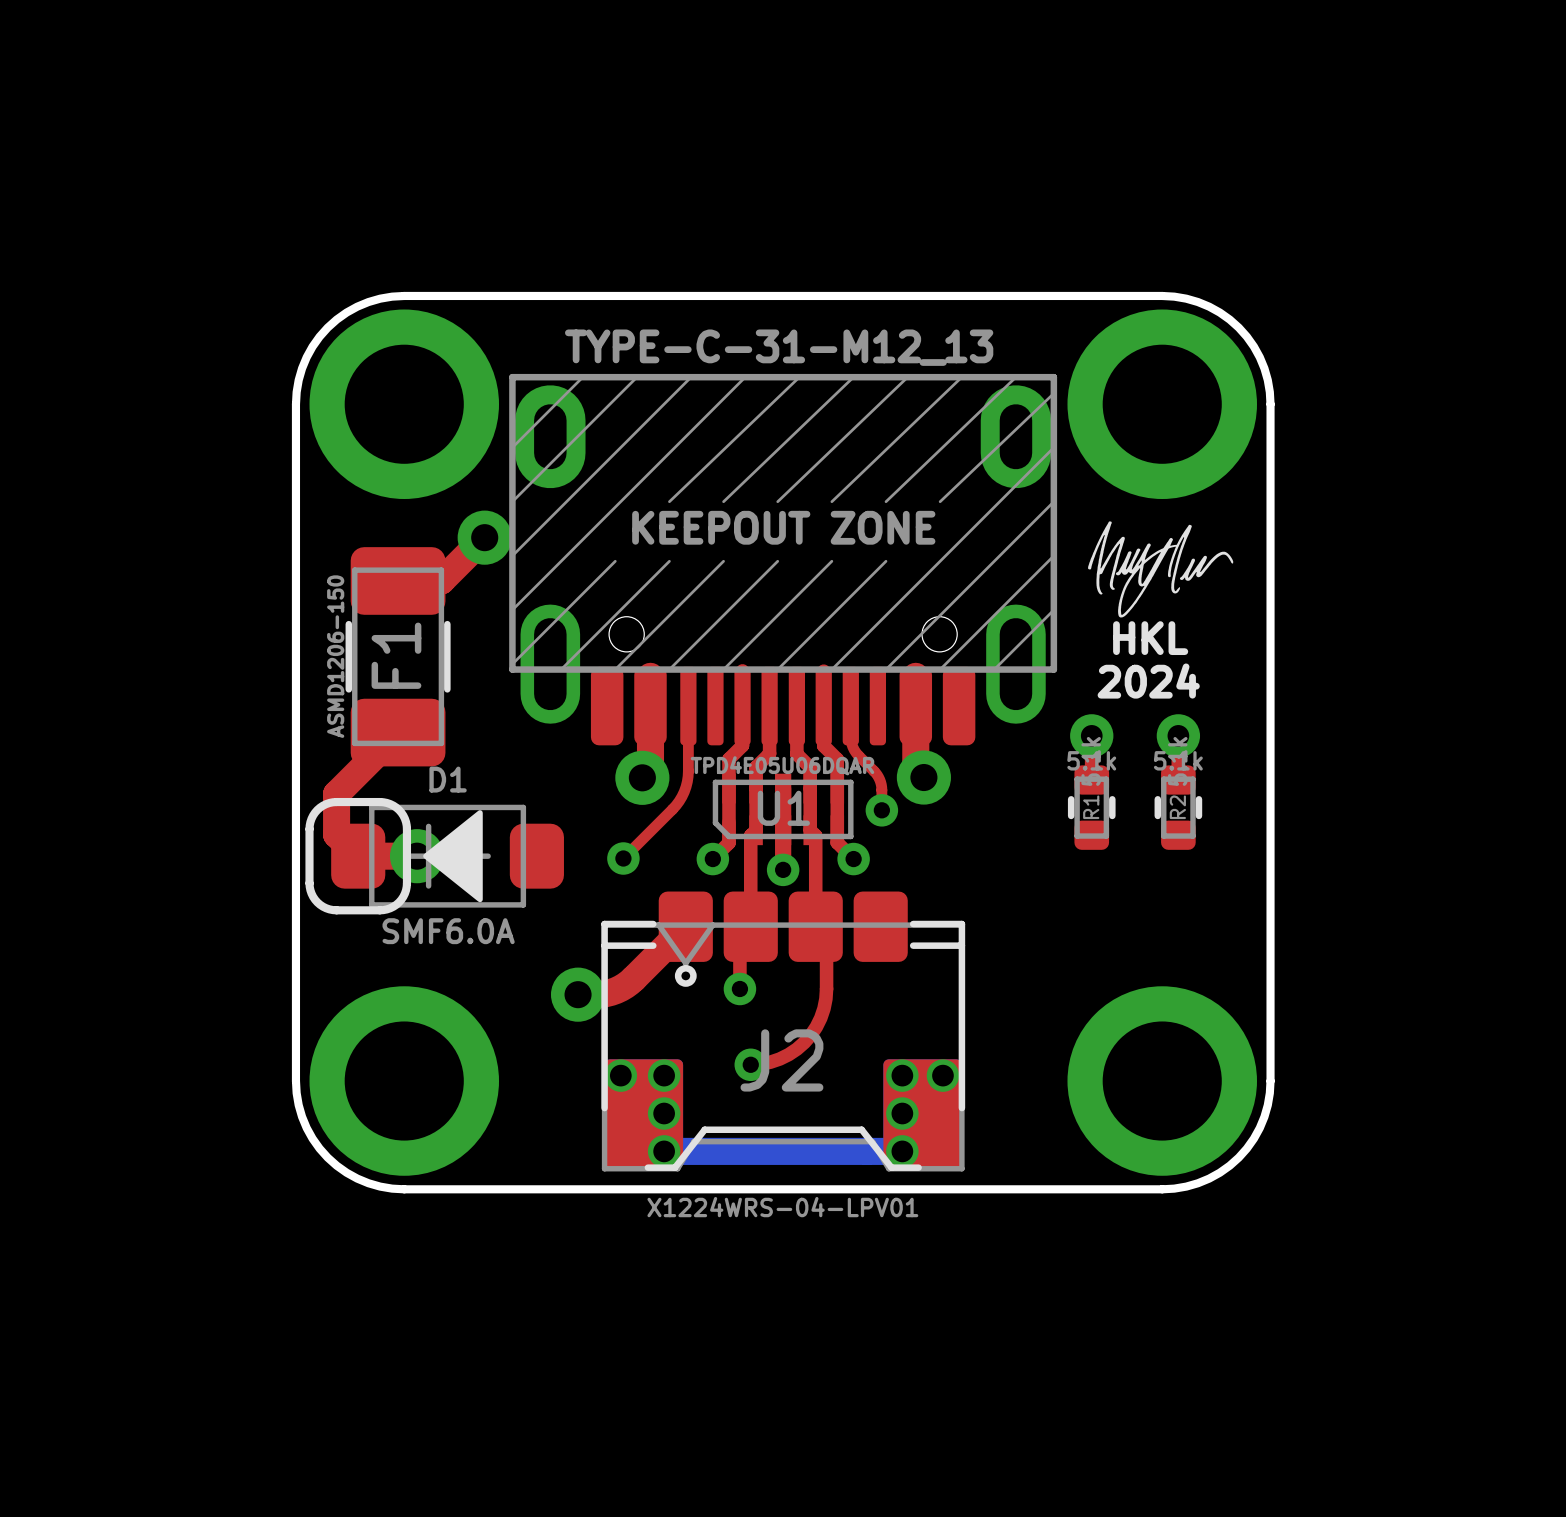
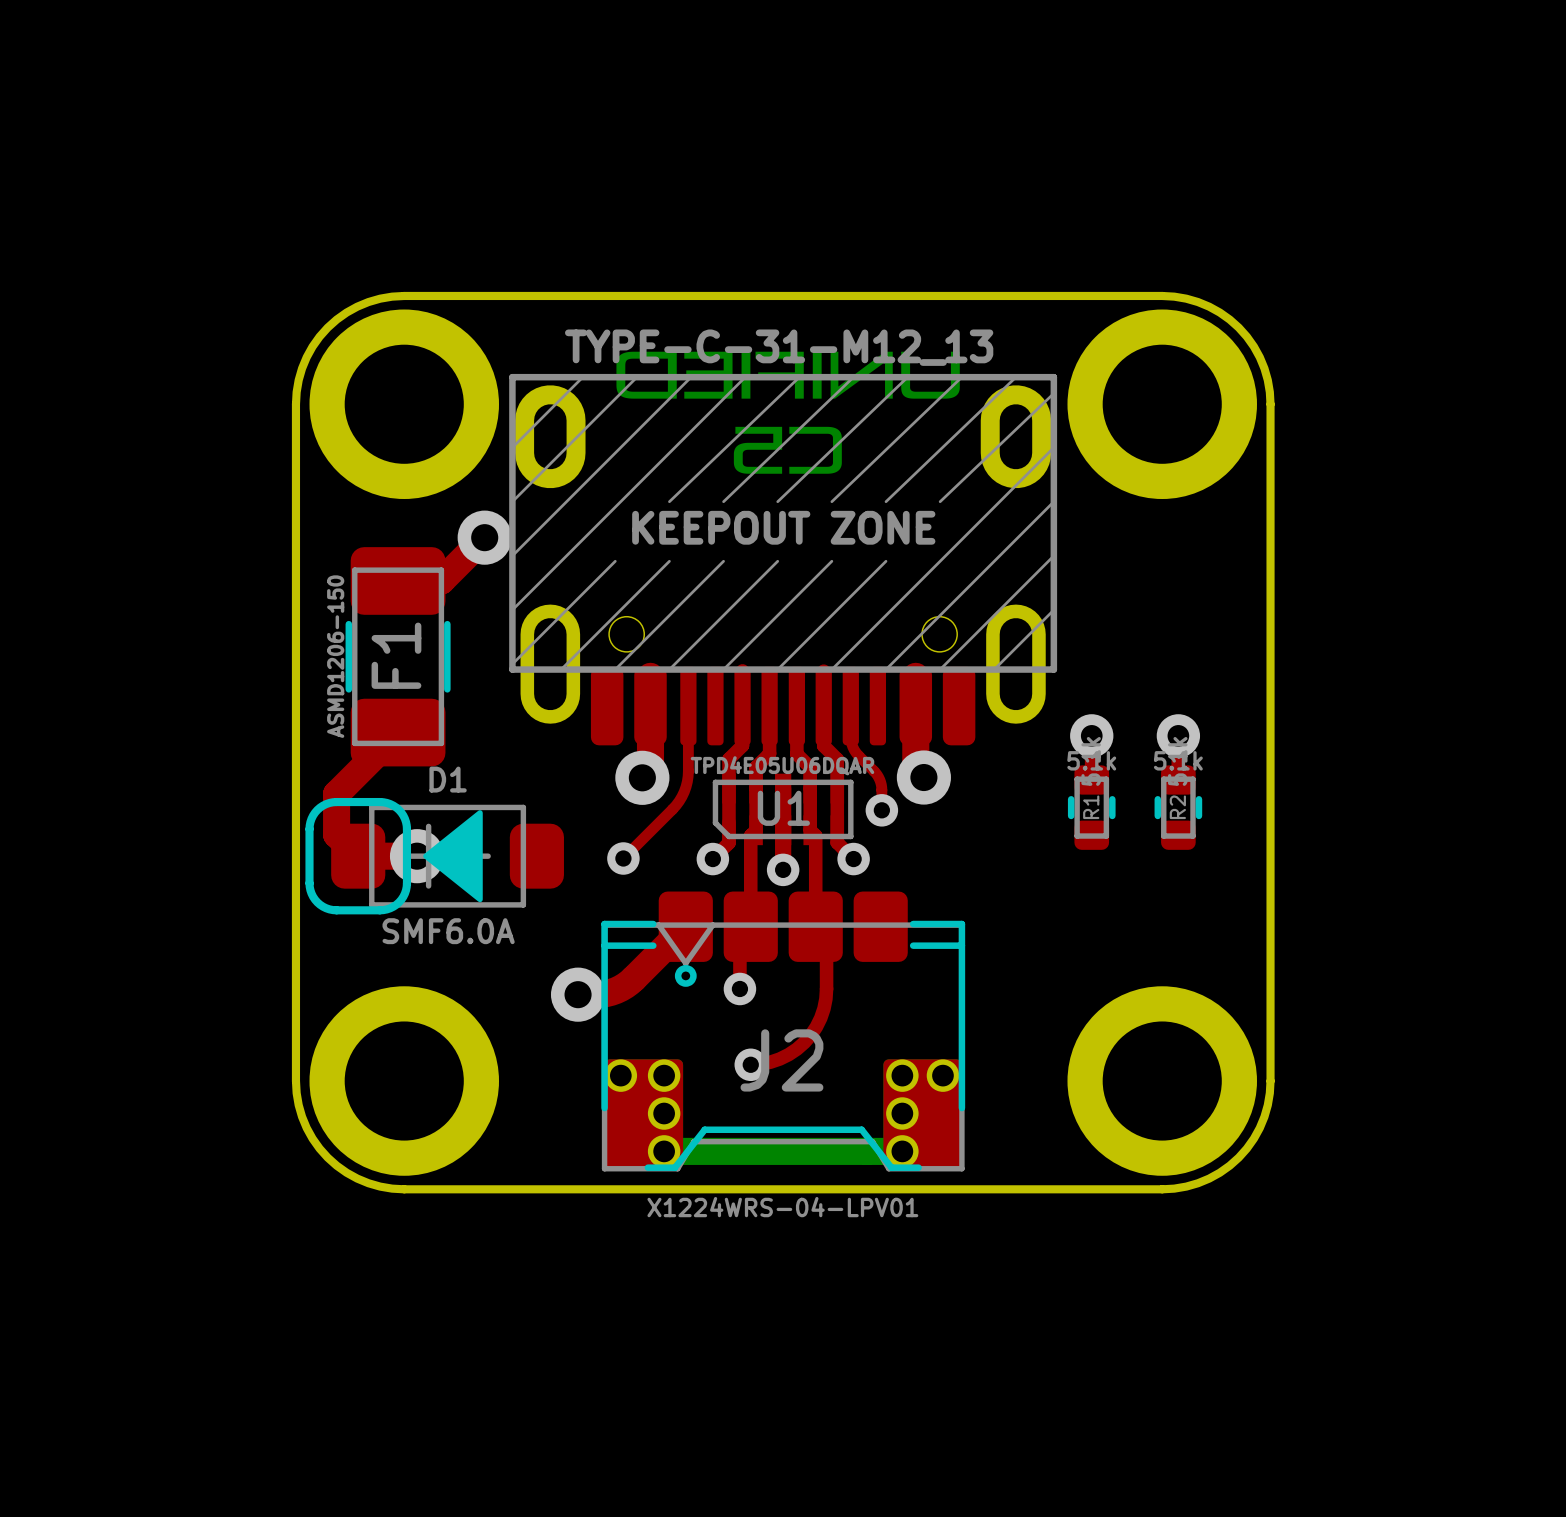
drawing: none -> [616, 351, 960, 474]
drawing: [1088, 521, 1234, 618] -> none
text: HKL (1150, 638) -> none
text: 2024 (1148, 681) -> none

